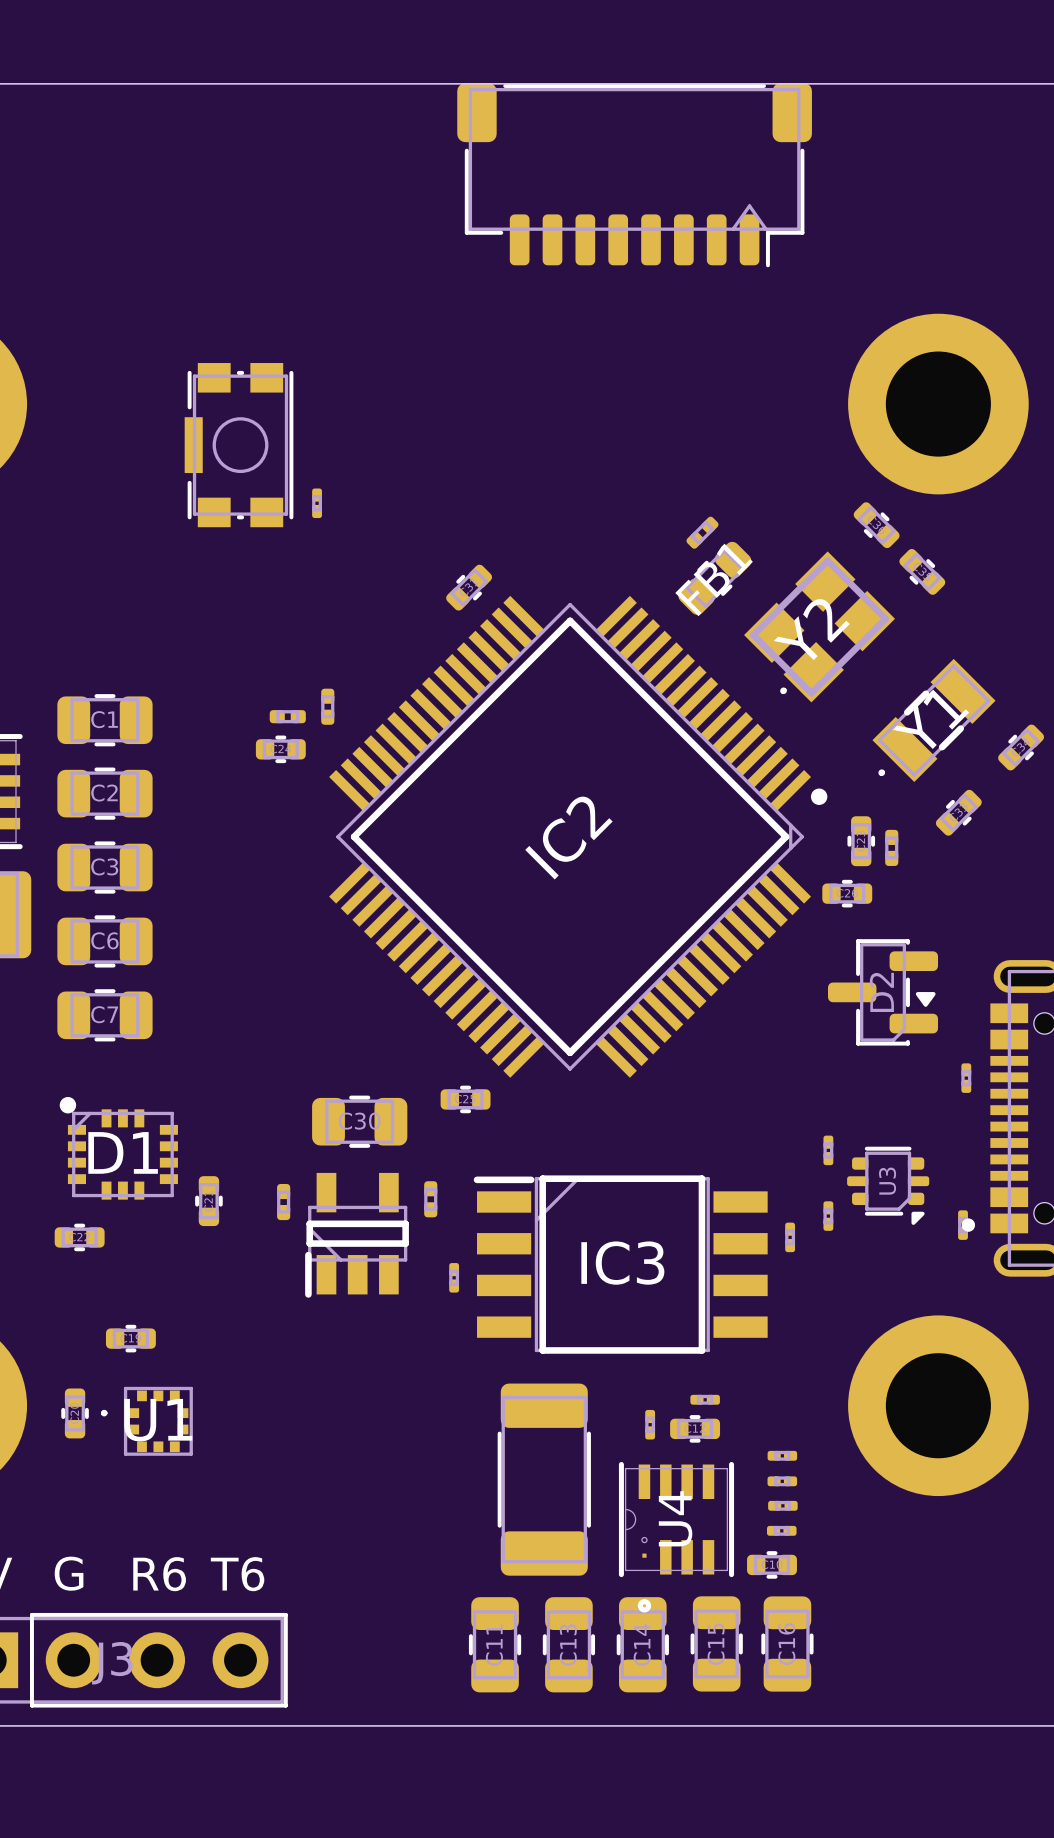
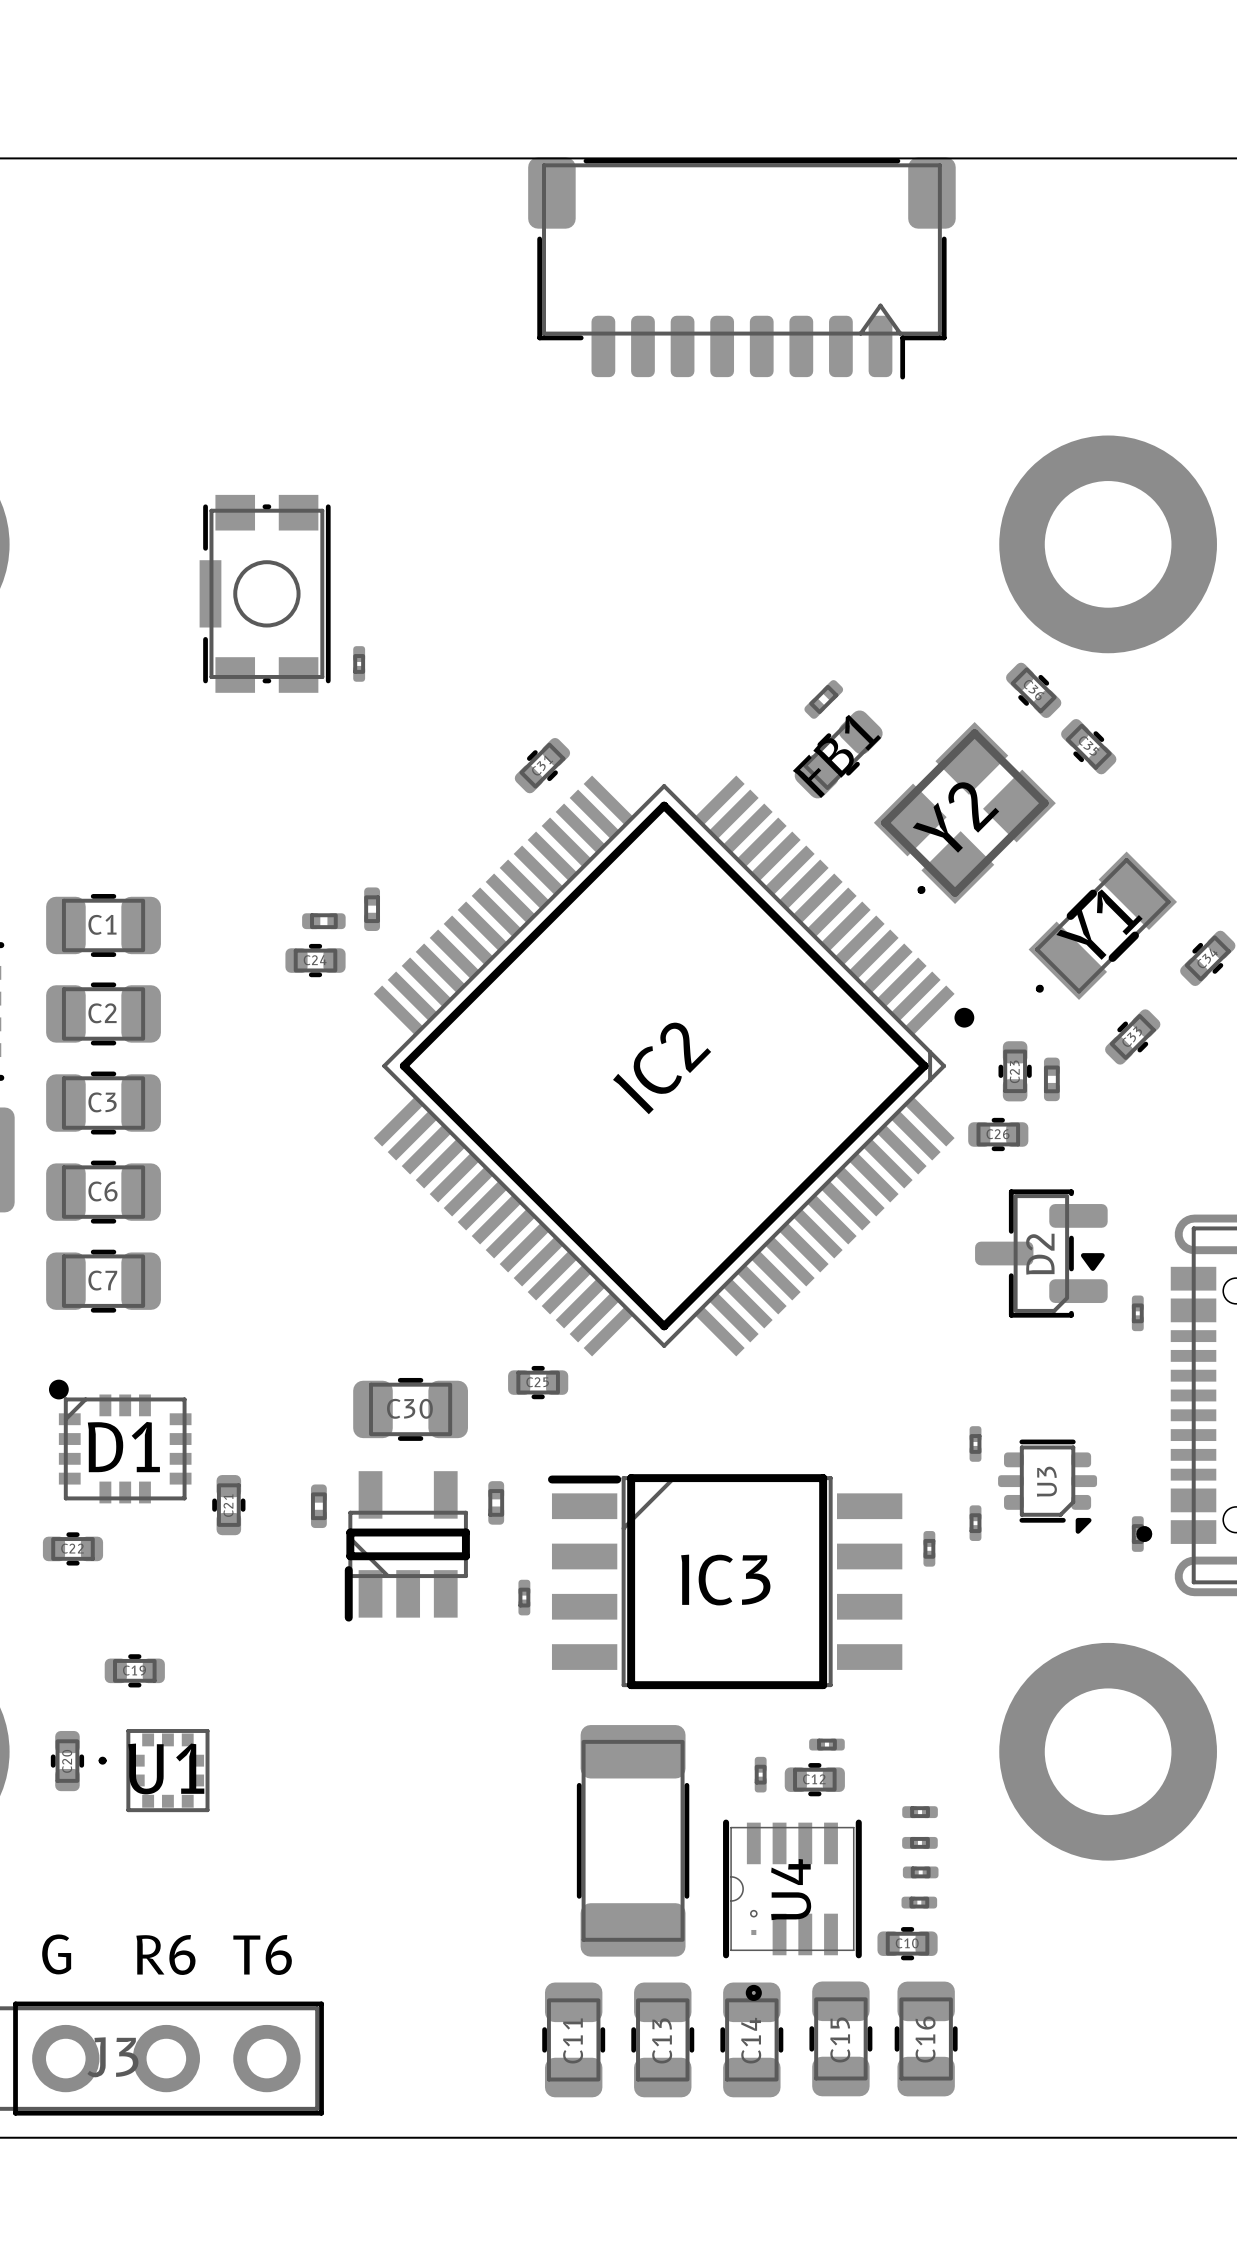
part position: (966, 1078) -> (1137, 1313)

